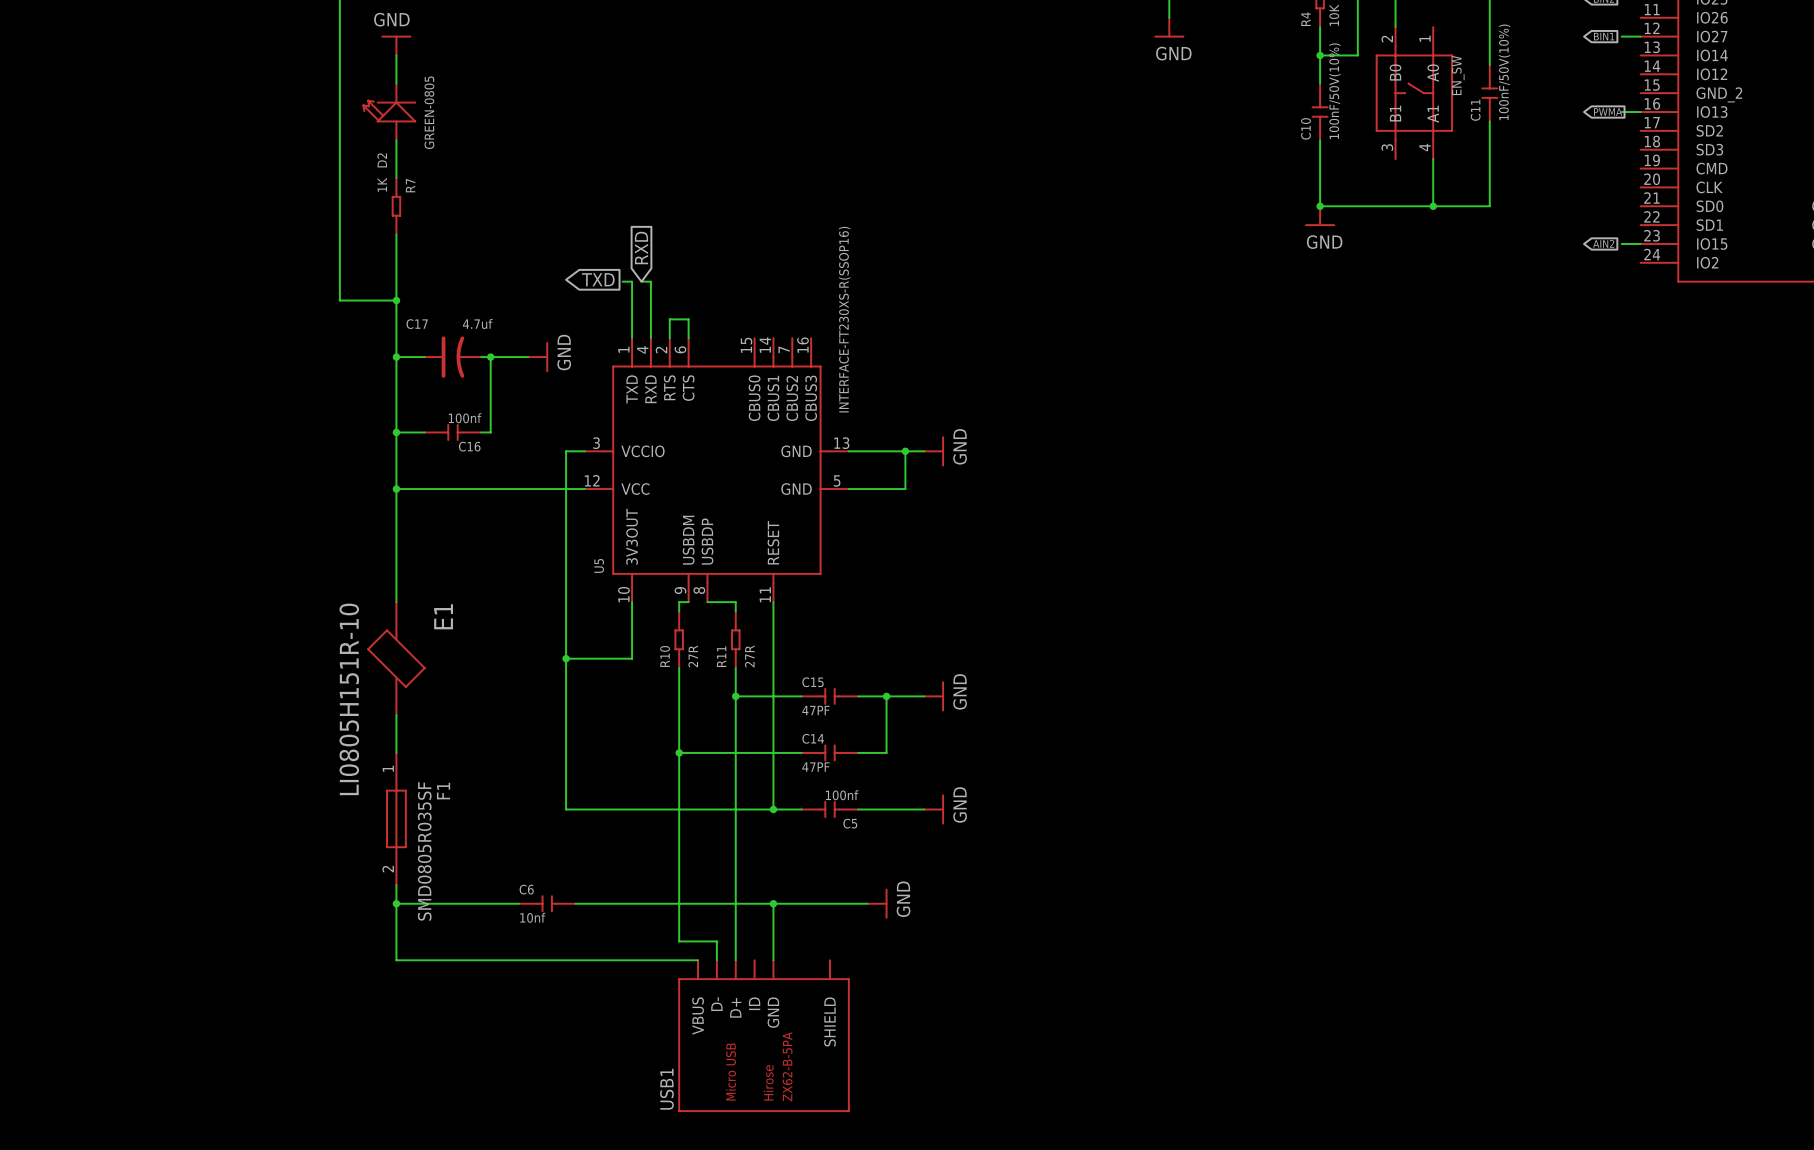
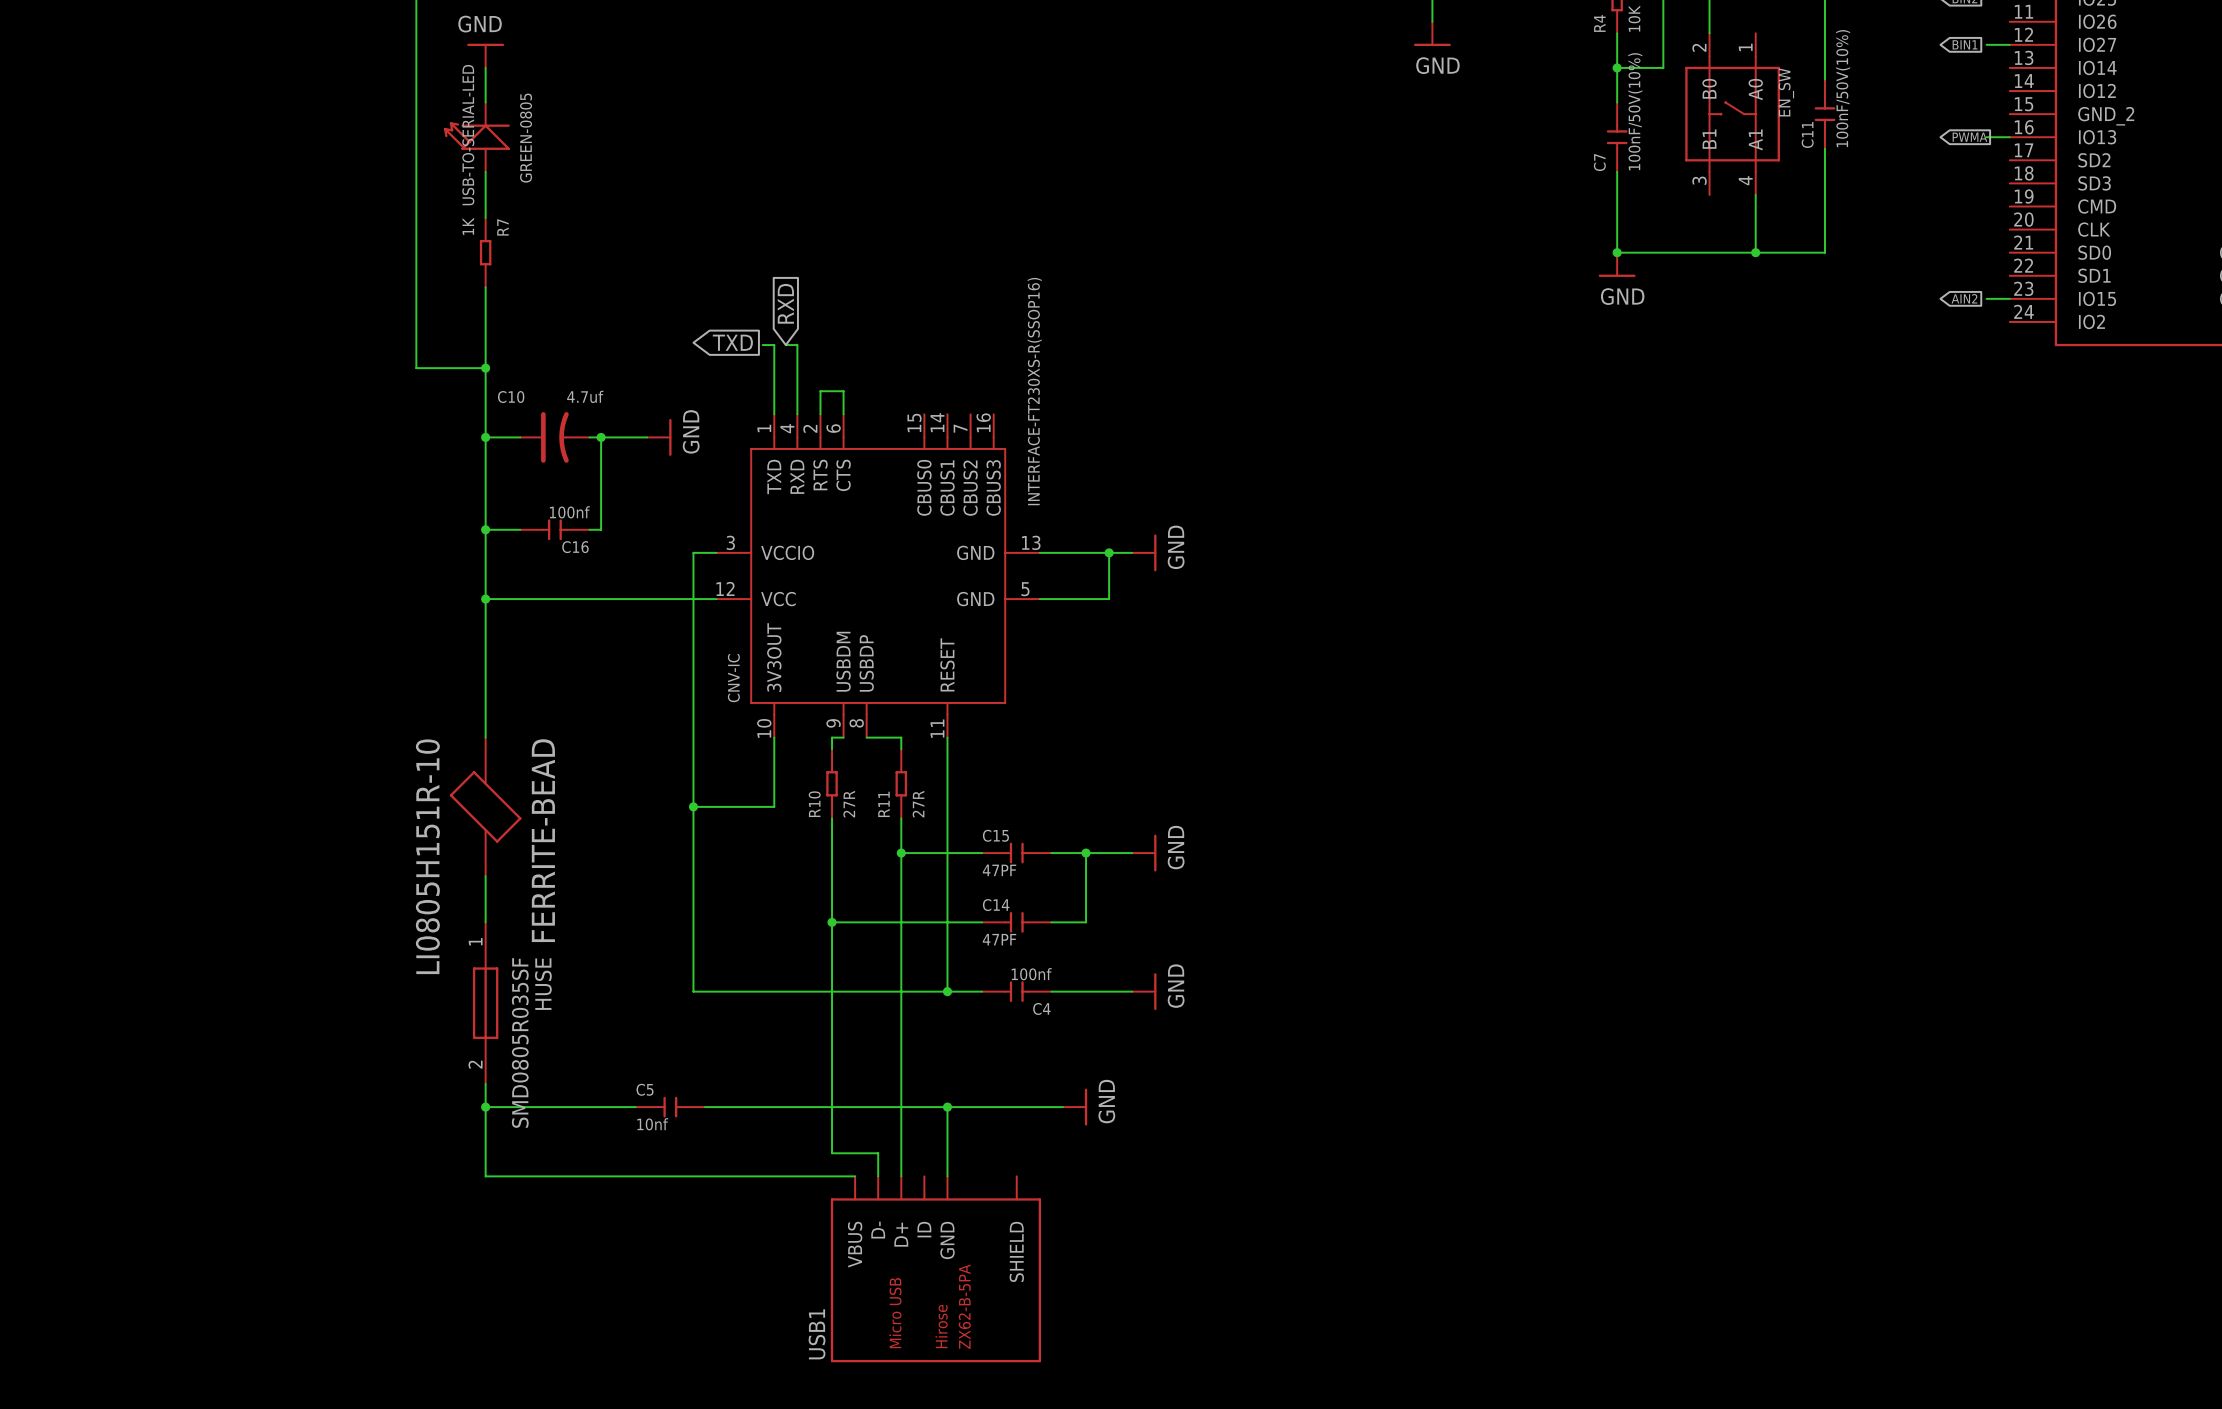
C10 name: C10 (1305, 128) -> C7 (1599, 162)
D2 name: D2 (382, 160) -> USB-TO-SERIAL-LED (468, 135)
C17 name: C17 (417, 324) -> C10 (511, 397)
U5 name: U5 (599, 565) -> CNV-IC (733, 678)
E1 name: E1 (443, 616) -> FERRITE-BEAD (543, 840)
F1 name: F1 (443, 791) -> HUSE (543, 984)
C5 name: C5 (850, 823) -> C4 (1041, 1008)
C6 name: C6 (526, 889) -> C5 (645, 1089)

